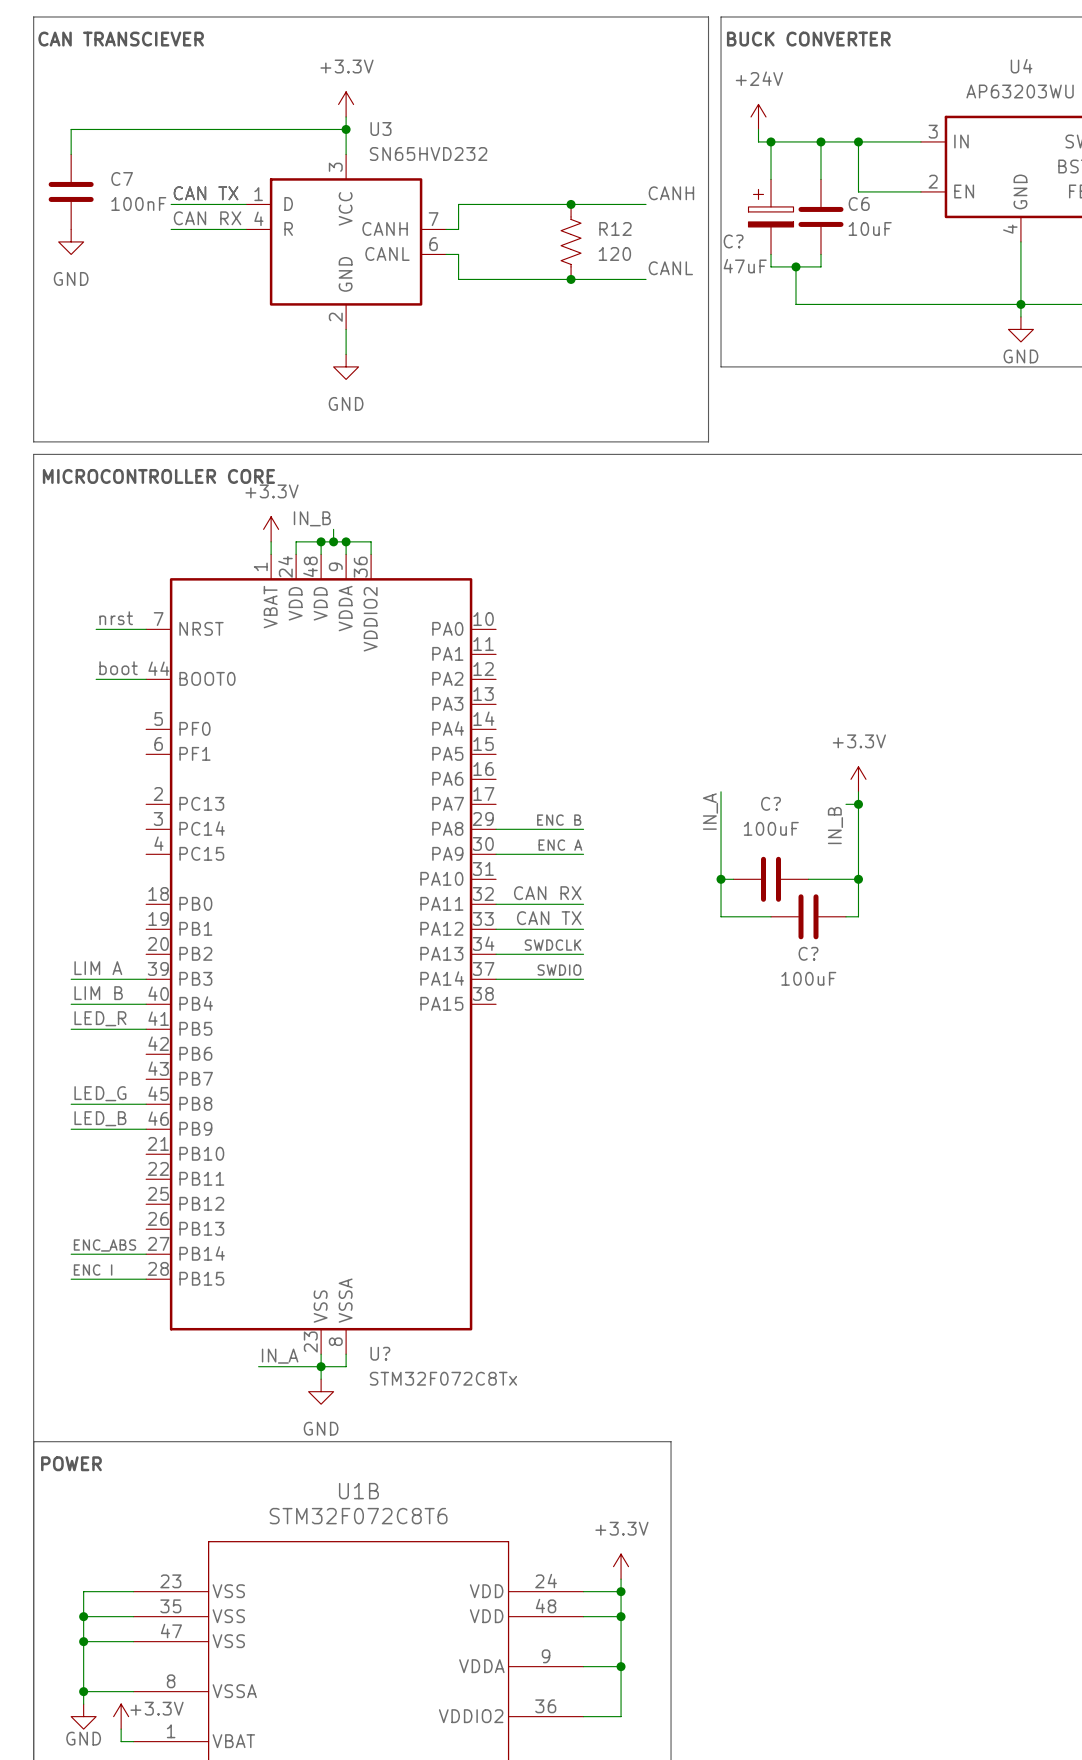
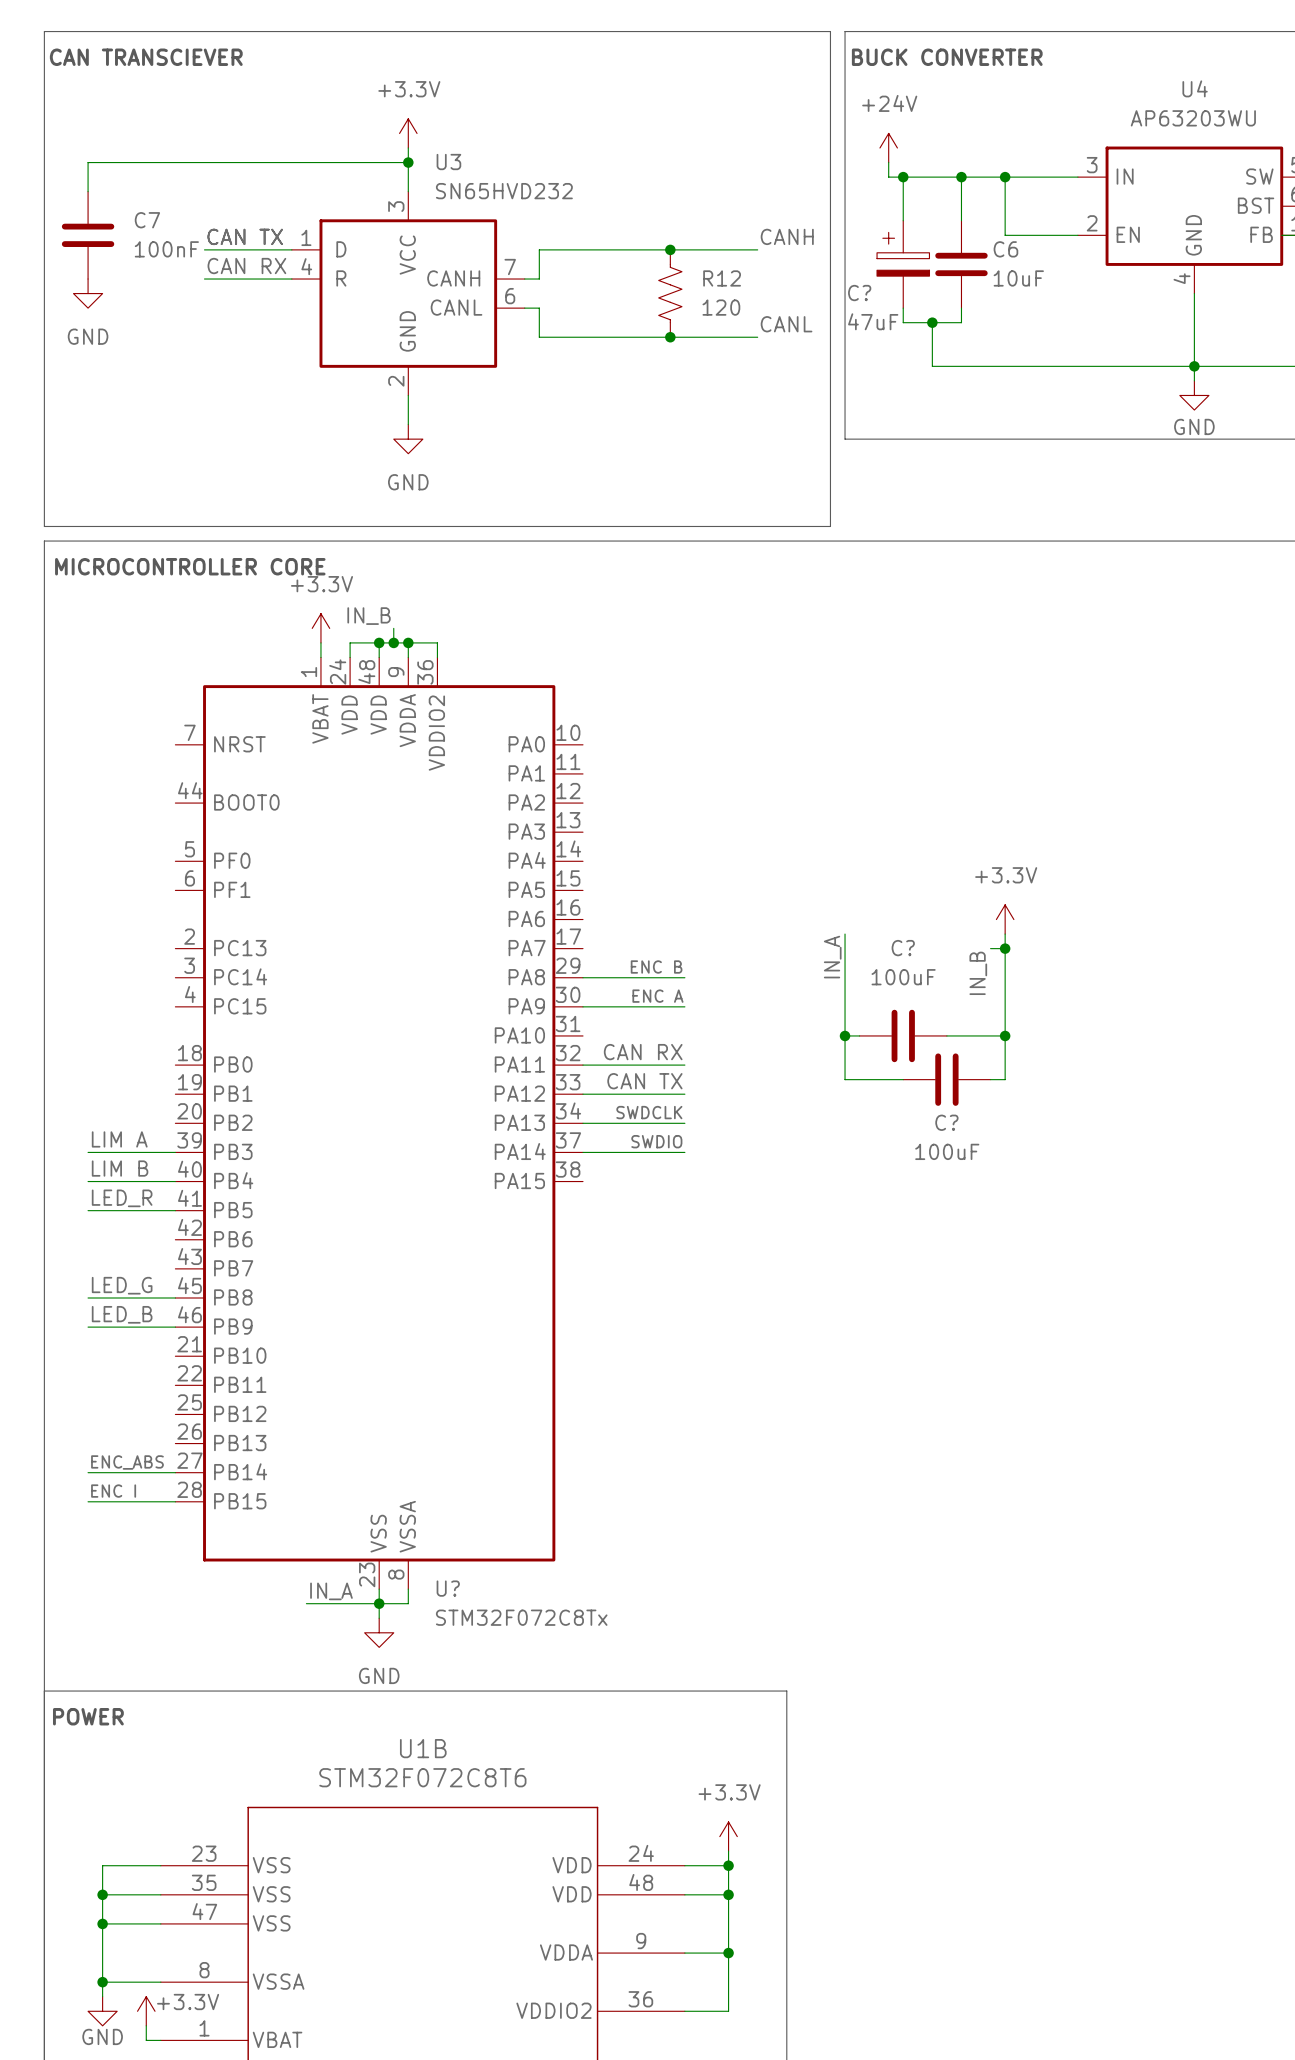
label: nrst (116, 618) -> none
wire: (96, 629) (146, 629) -> none
label: boot (118, 668) -> none
wire: (96, 679) (146, 679) -> none

